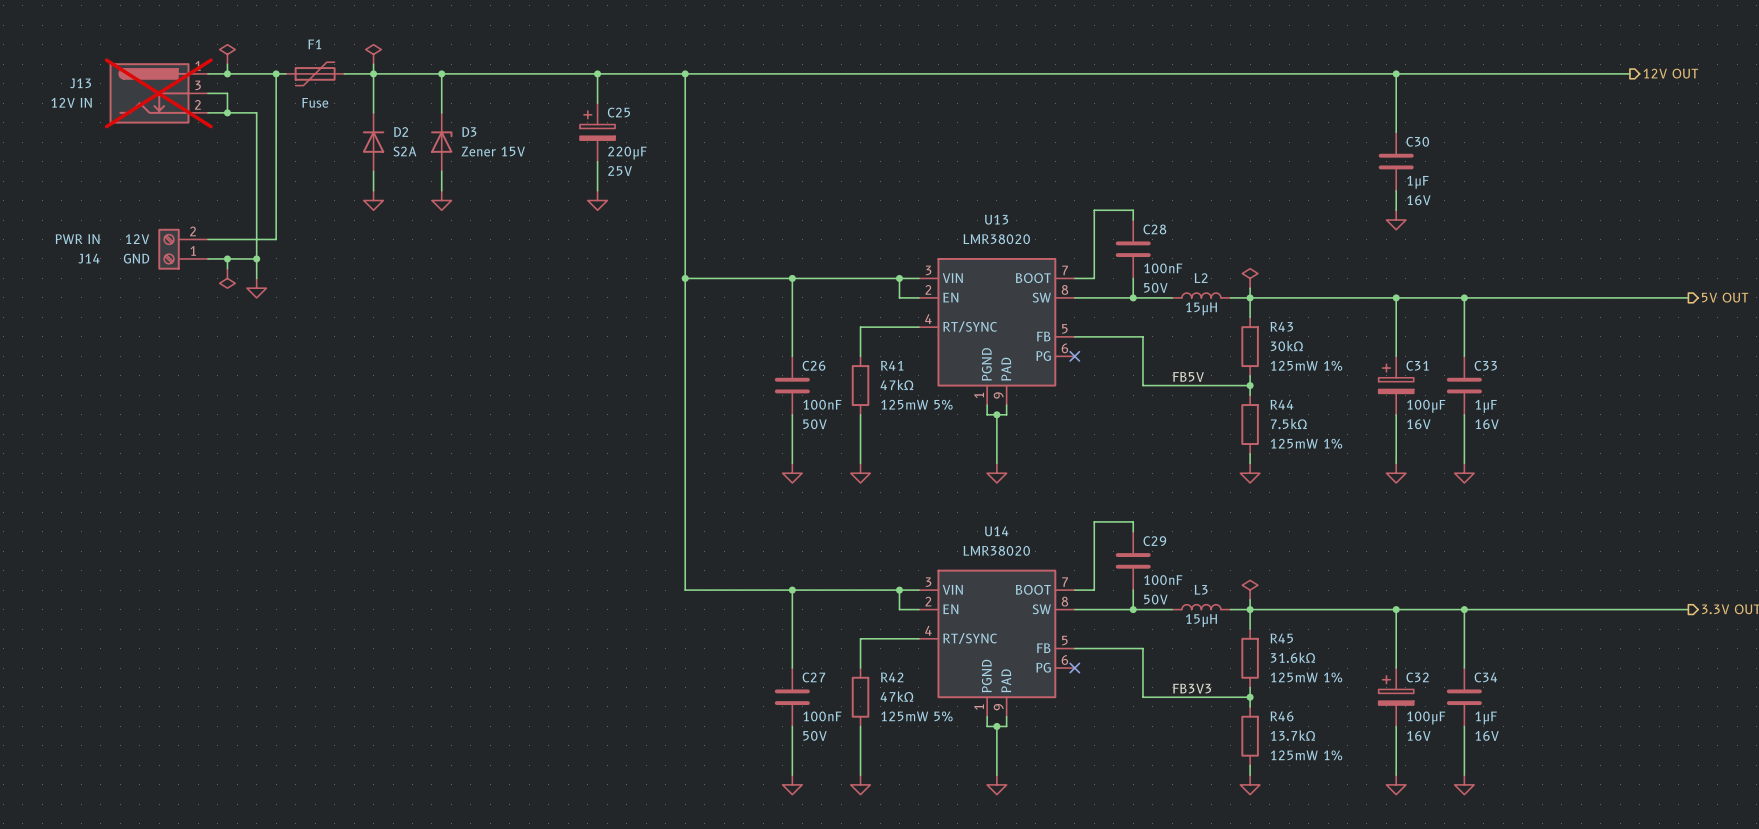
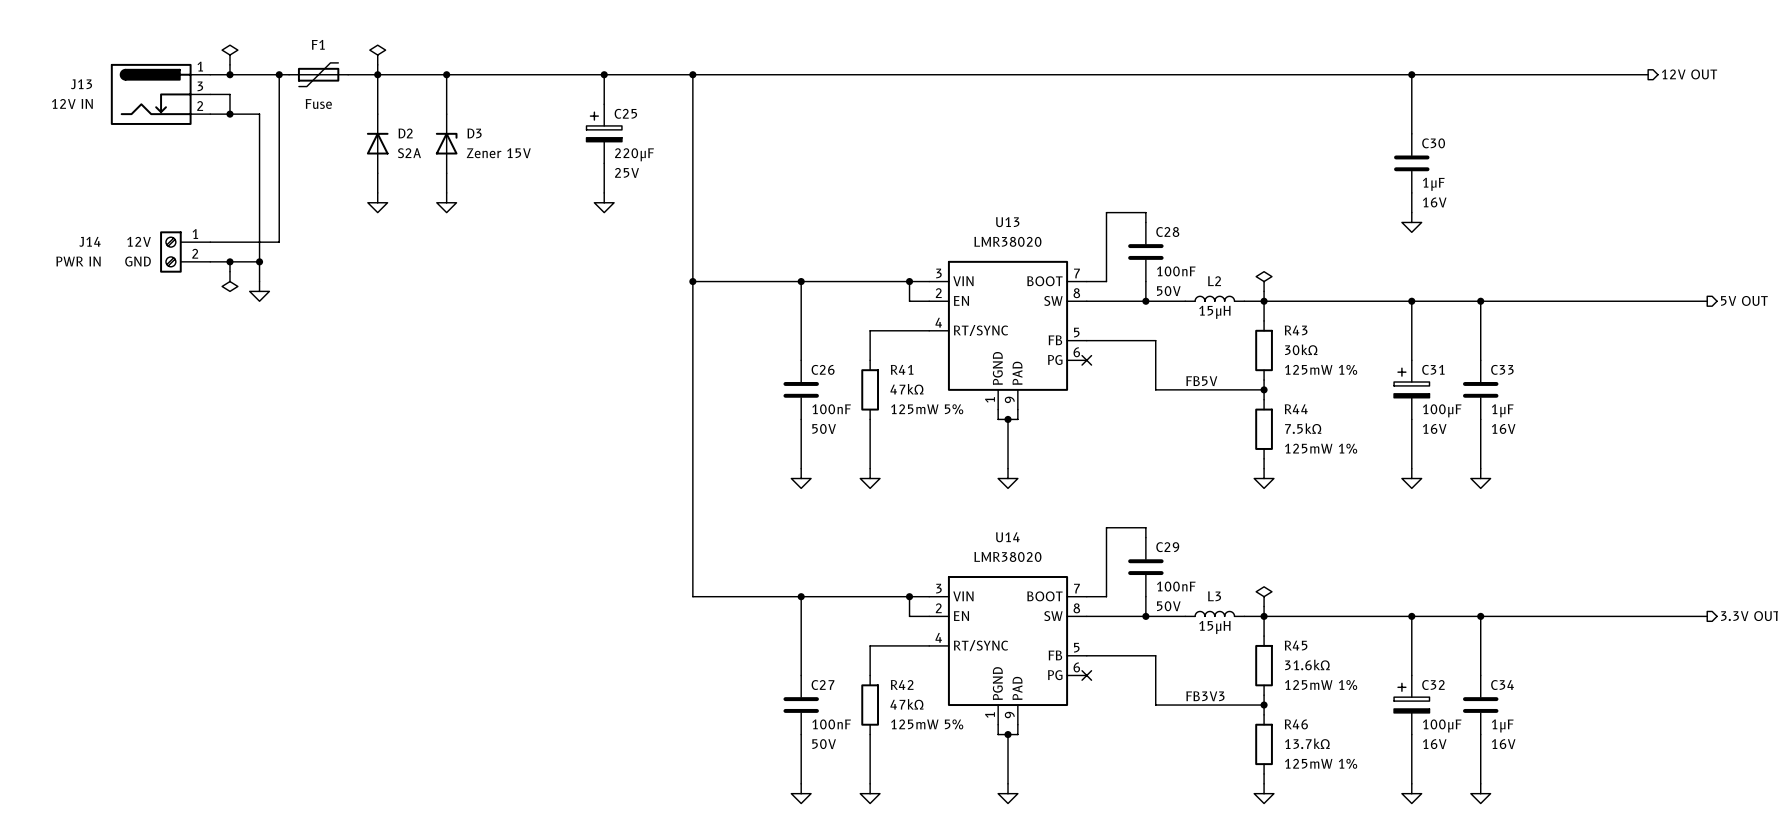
J13 do-not-place cross: (158, 93) -> none
J14 flip: as is (169, 249) -> up-down (170, 252)

